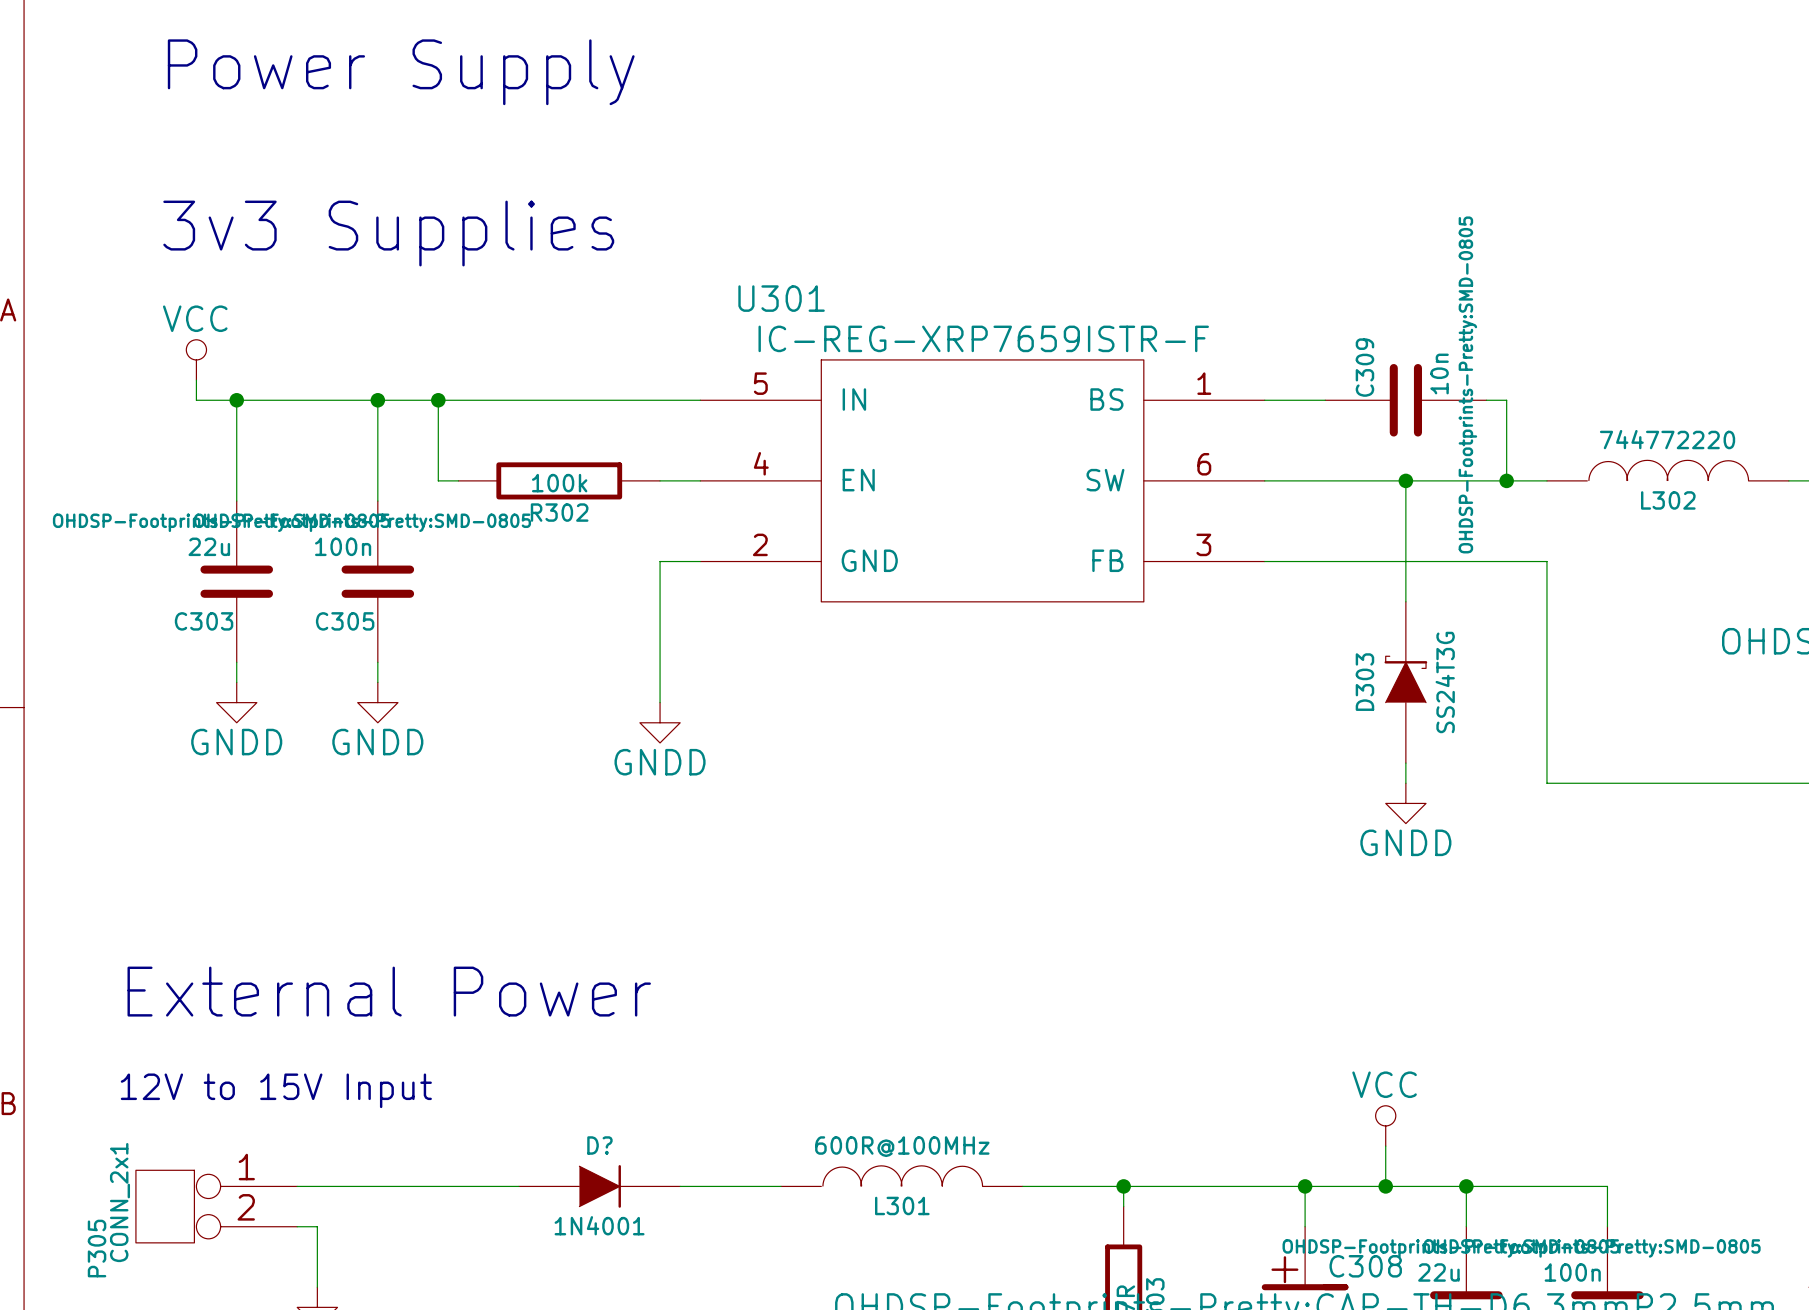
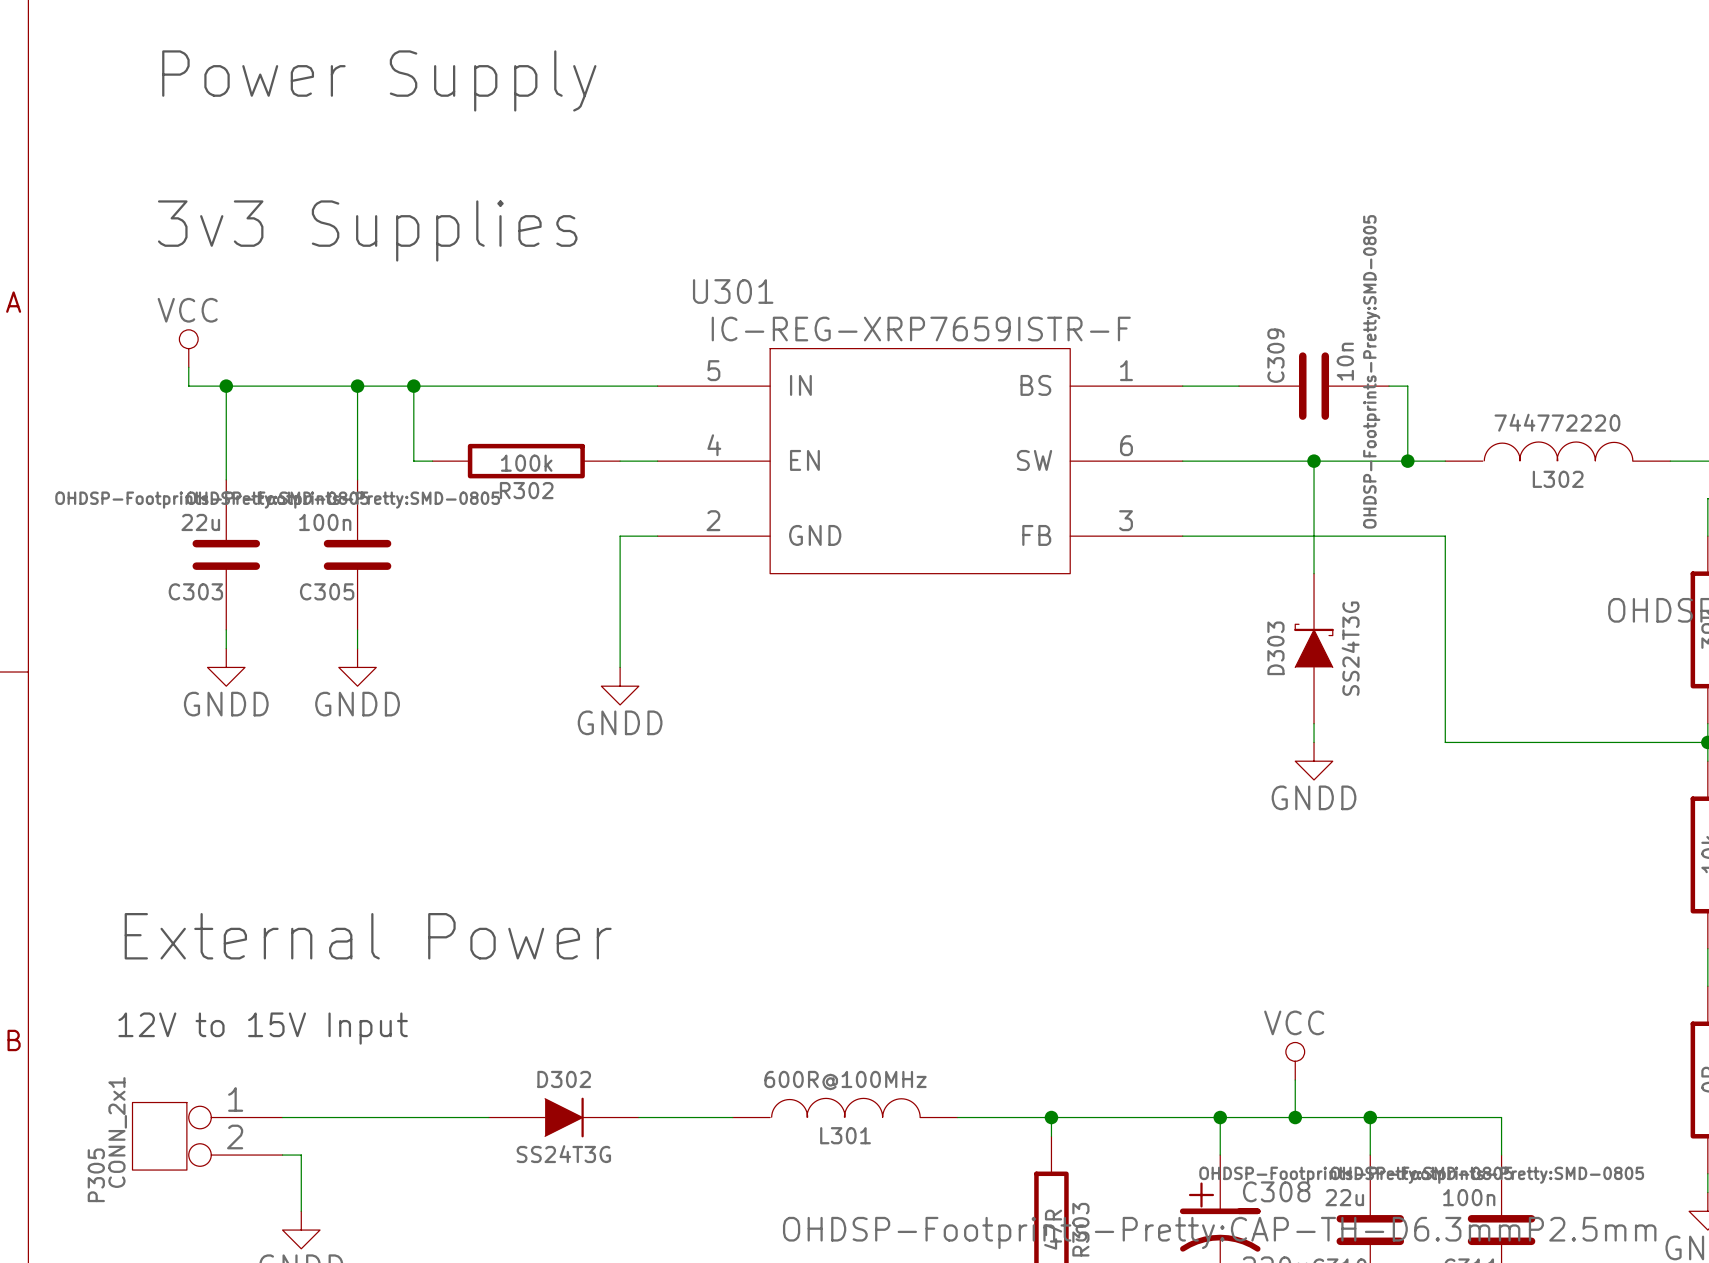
D? name: D? (599, 1145) -> D302 (564, 1079)
D? value: 1N4001 (599, 1225) -> SS24T3G (563, 1154)

